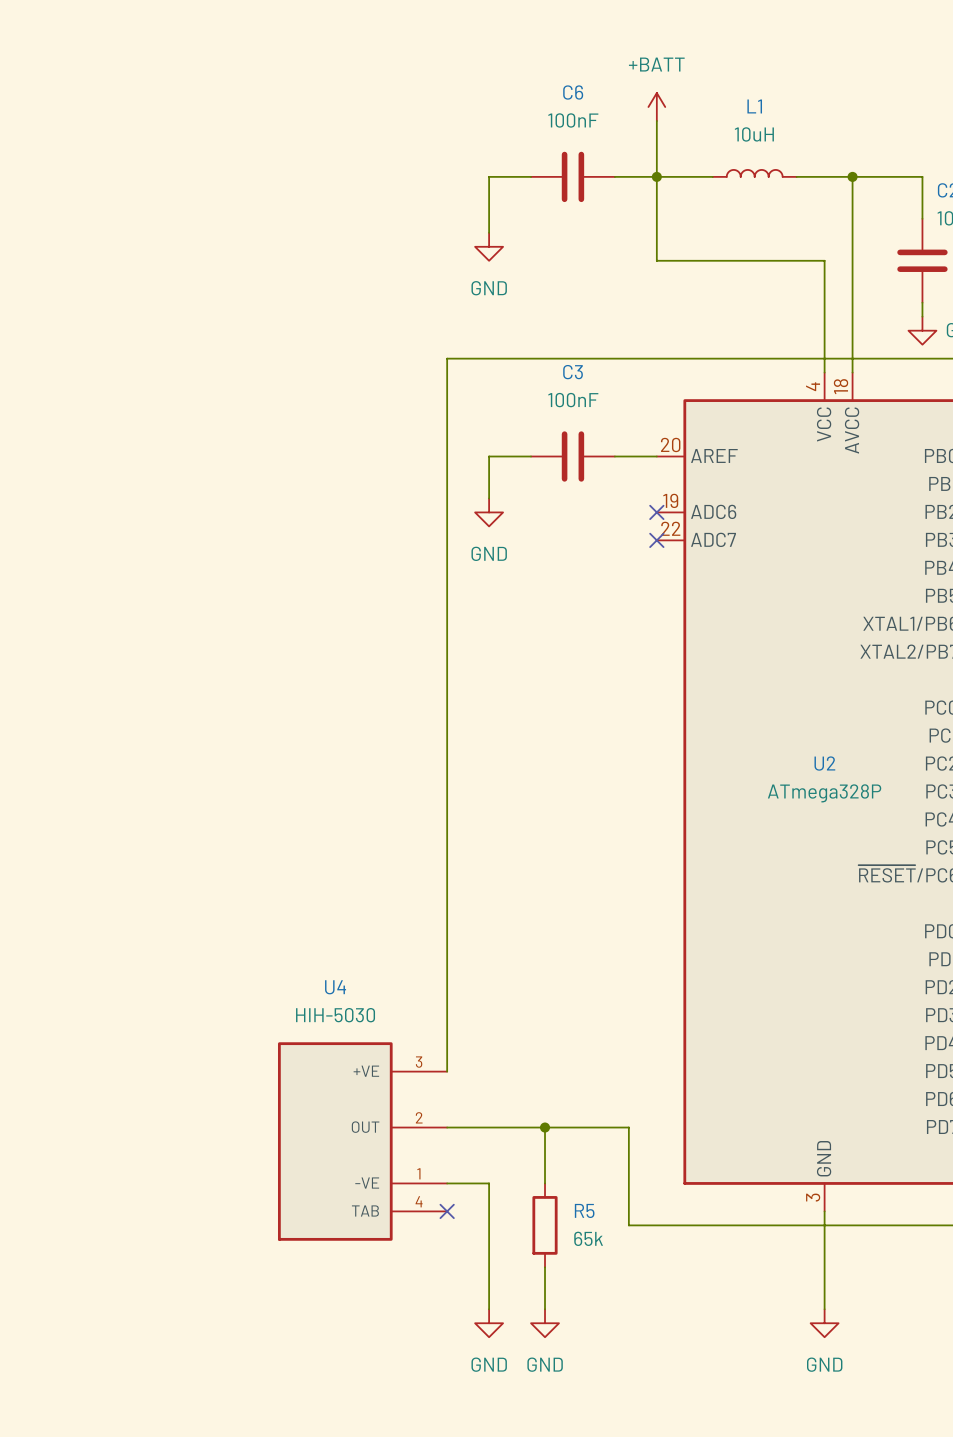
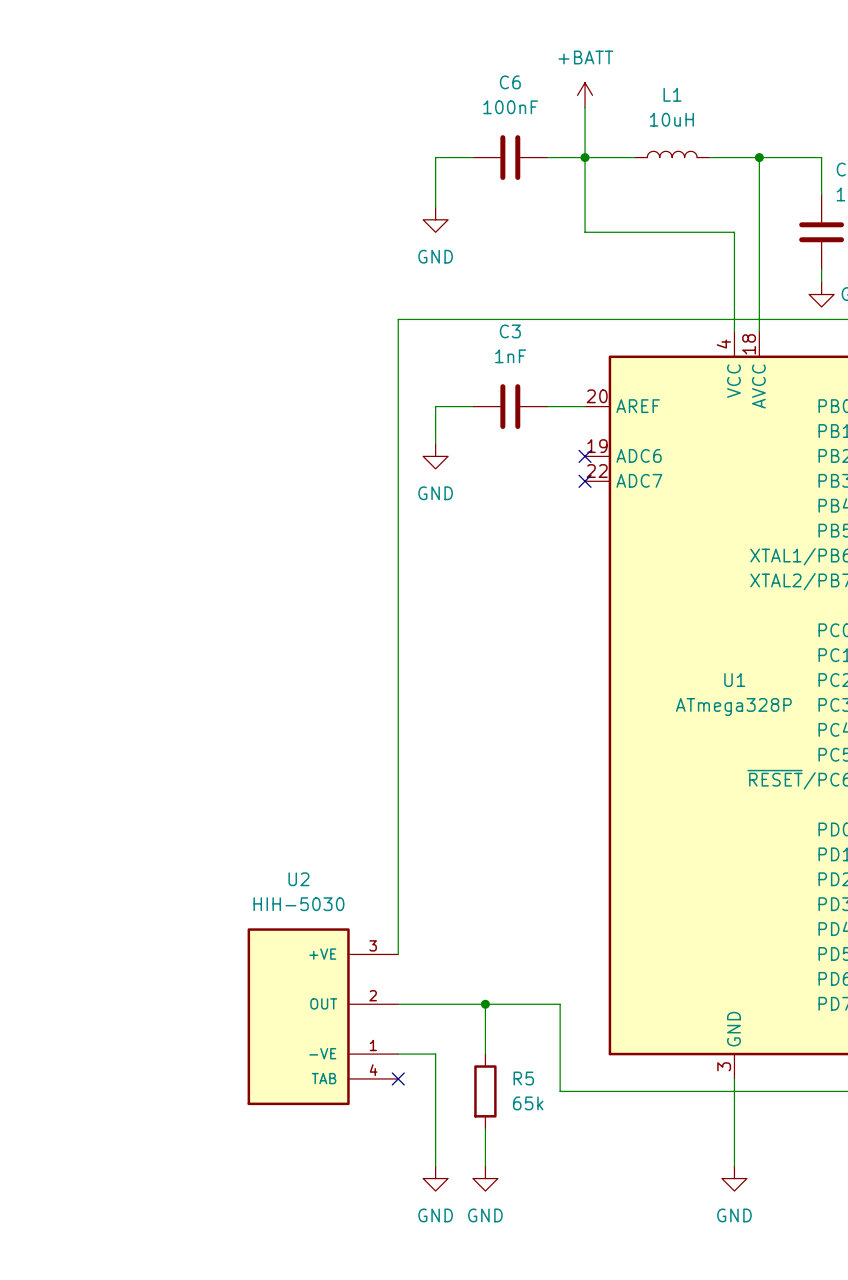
C3 value: 100nF (573, 400) -> 1nF (510, 356)
U2 name: U2 (824, 763) -> U1 (734, 680)
U4 name: U4 (335, 987) -> U2 (298, 879)

